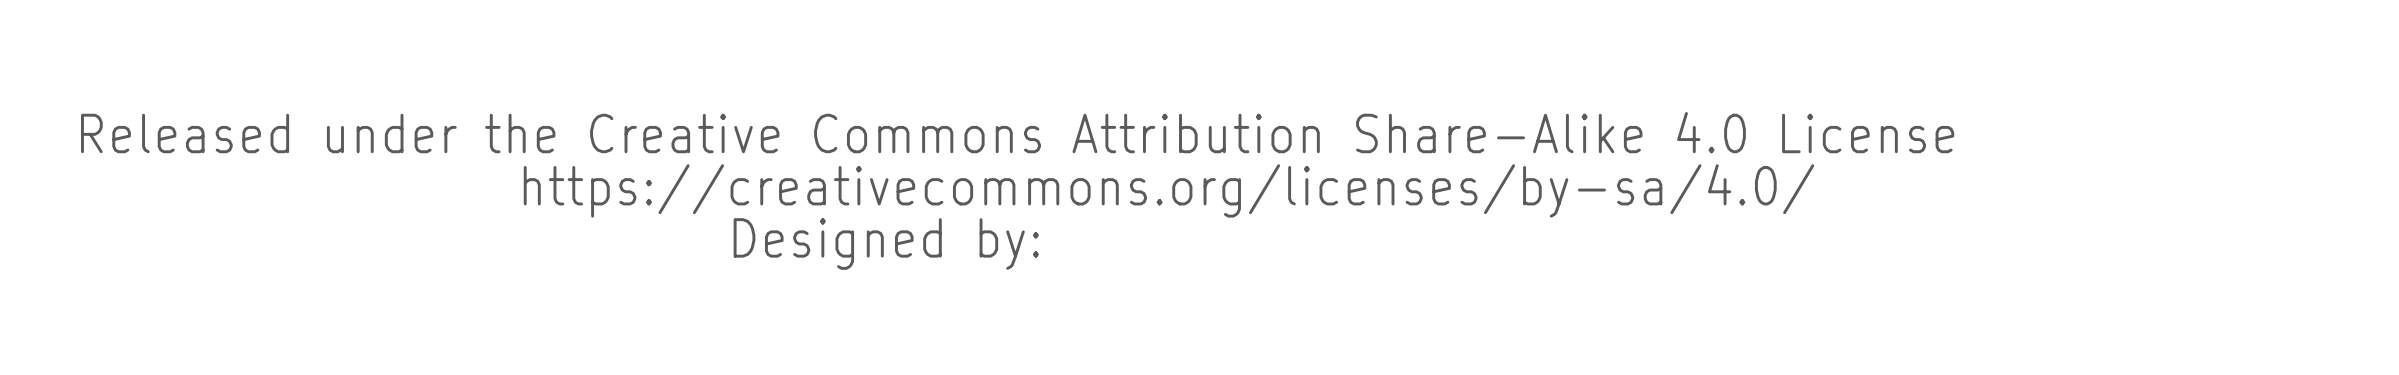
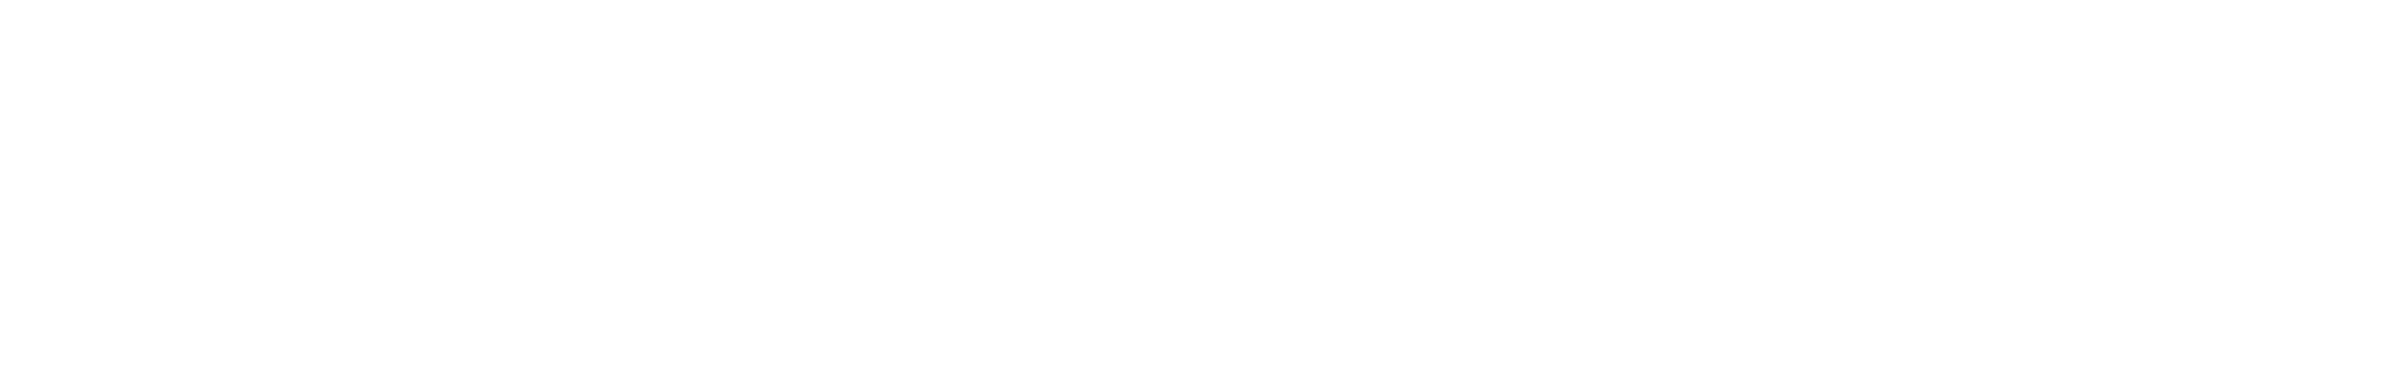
drawing: [80, 112, 1955, 270] -> none

